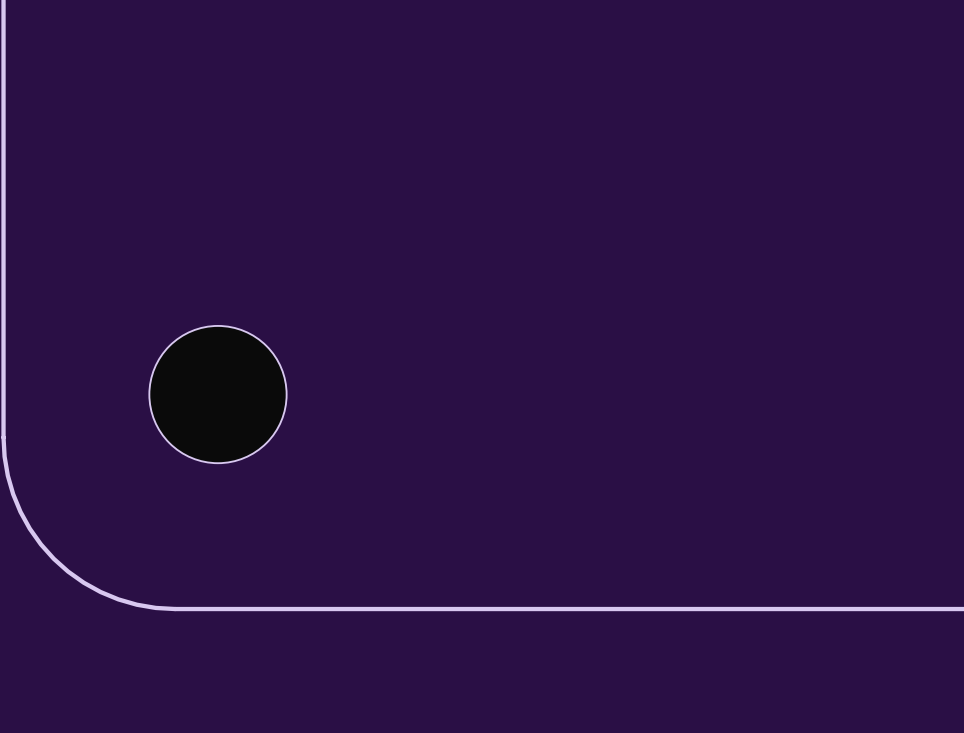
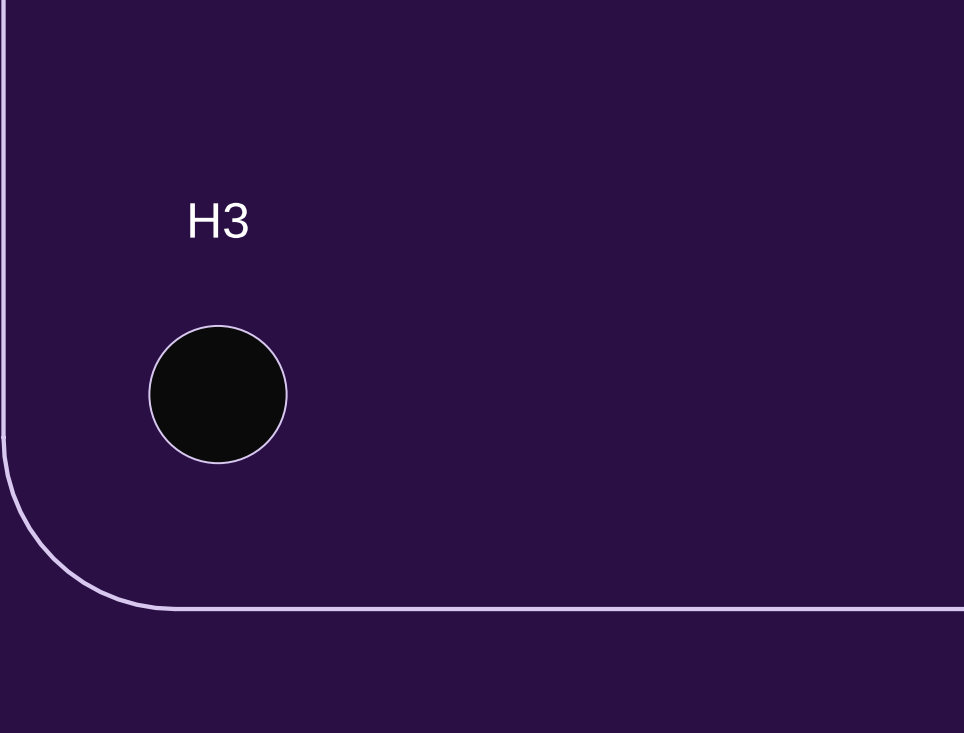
H3 name: none -> H3 (218, 220)

